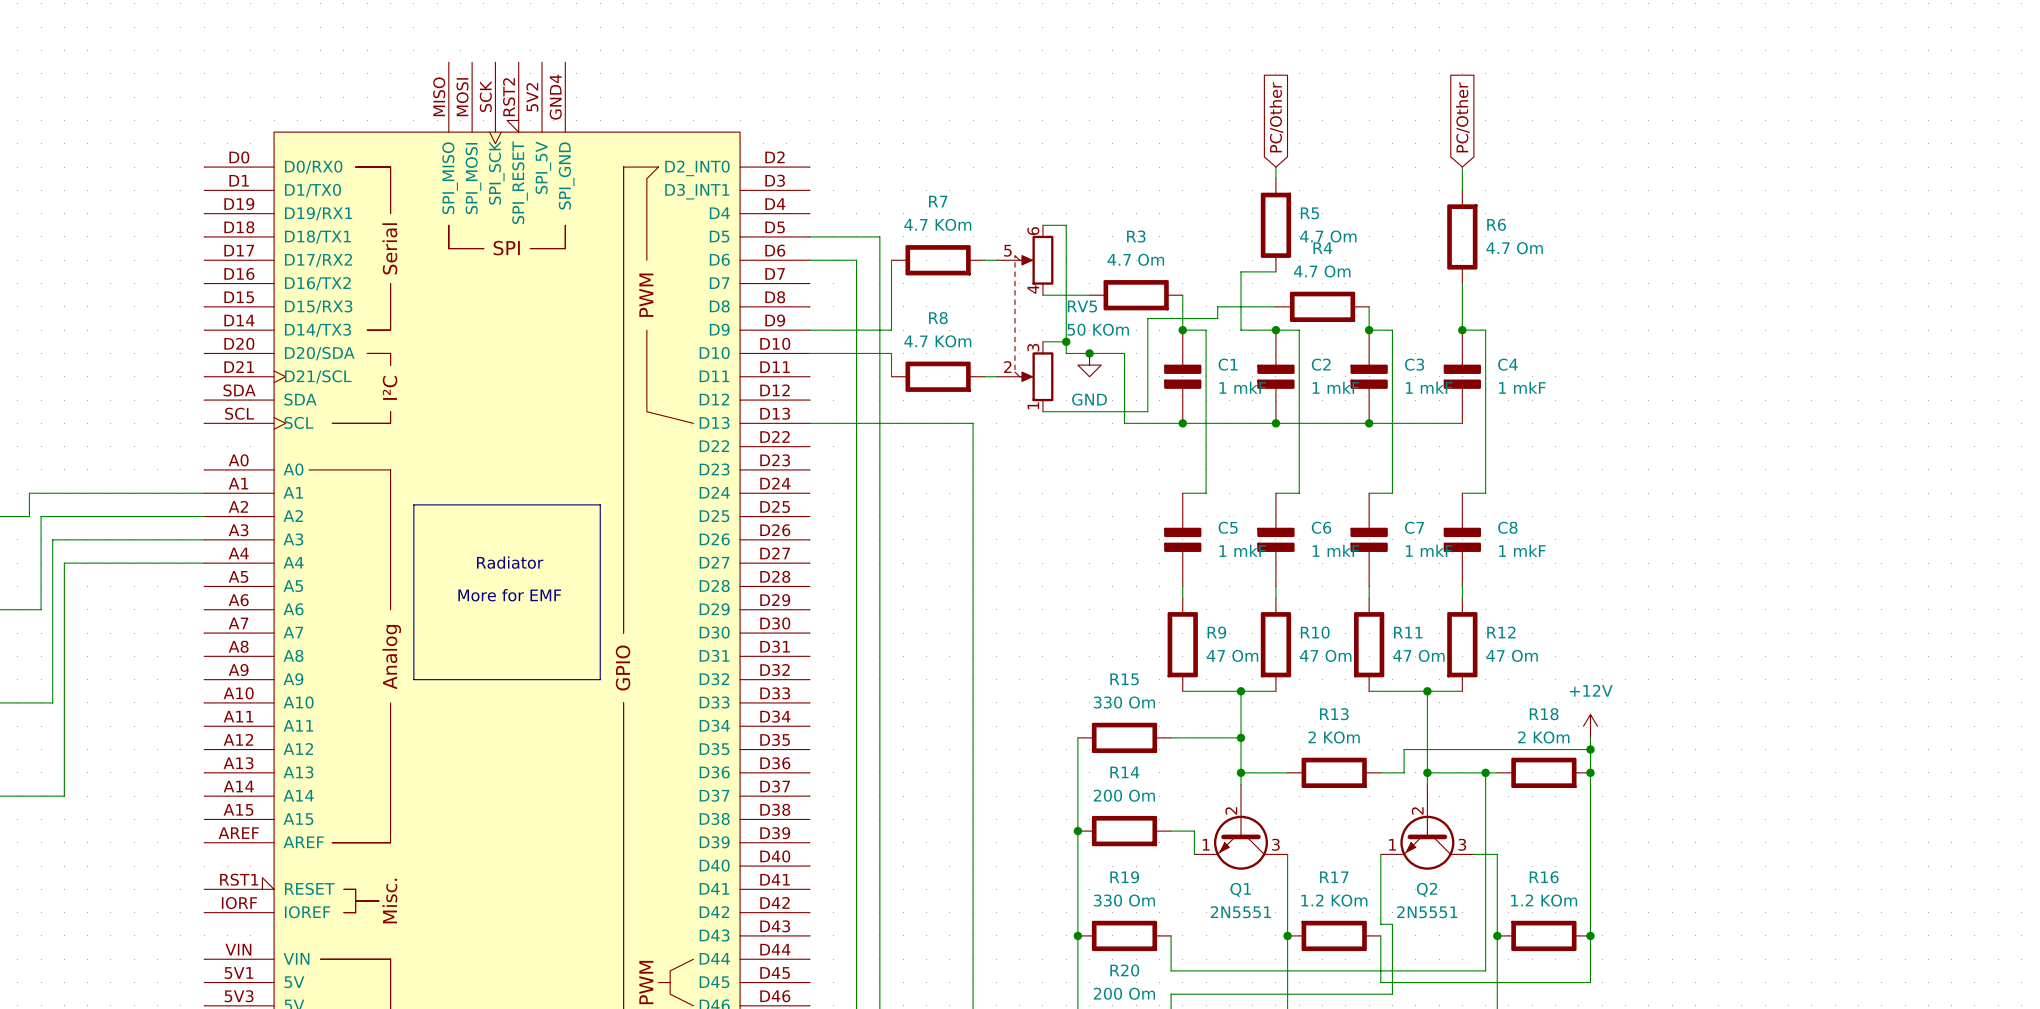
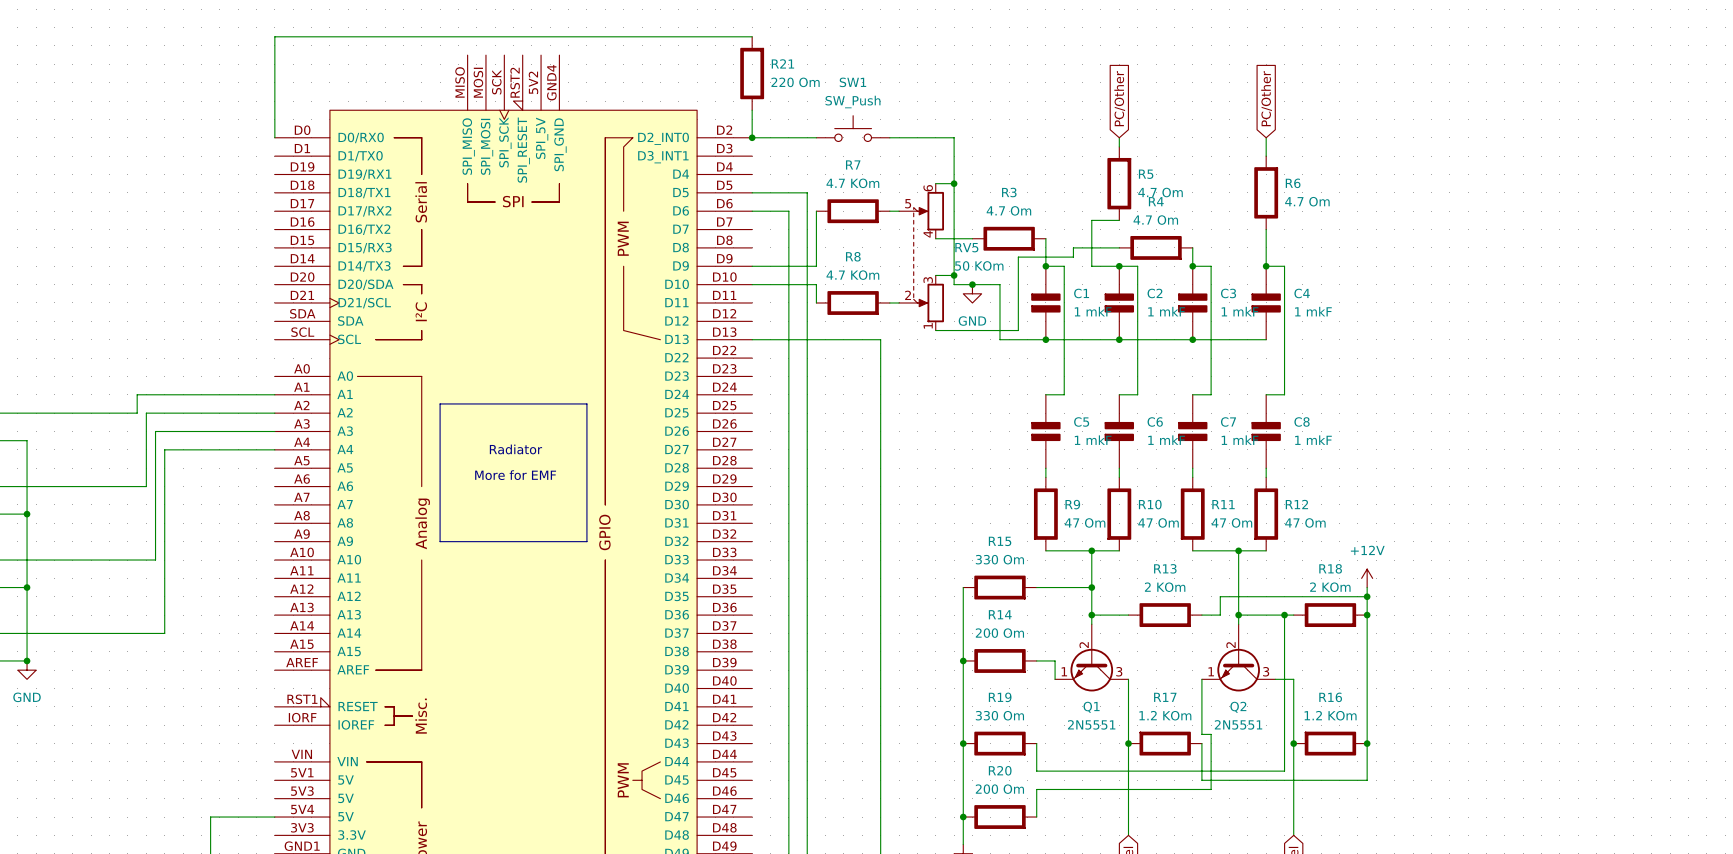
wire: none -> (752, 36) (274, 36) (274, 137)
R21: none -> 220 Om (752, 73)
wire: none -> (752, 110) (752, 137) (816, 137)
SW1: none -> SW_Push (853, 128)
junction: none -> (752, 137)
wire: none -> (889, 137) (954, 137) (954, 183)
junction: none -> (954, 183)

